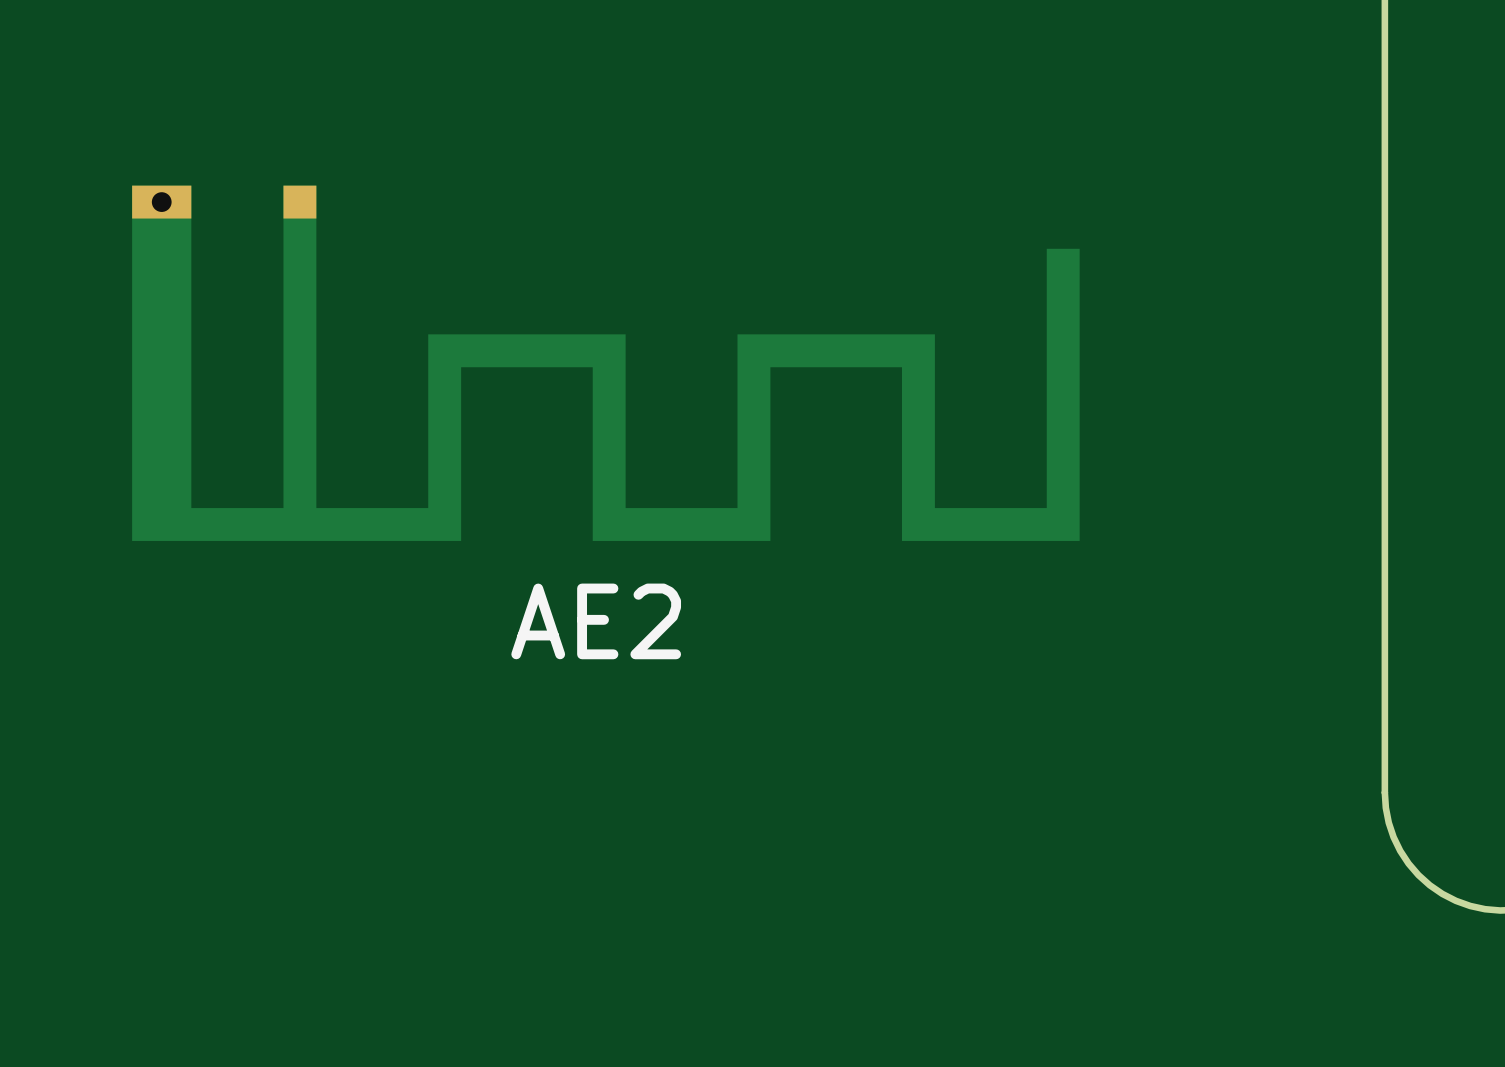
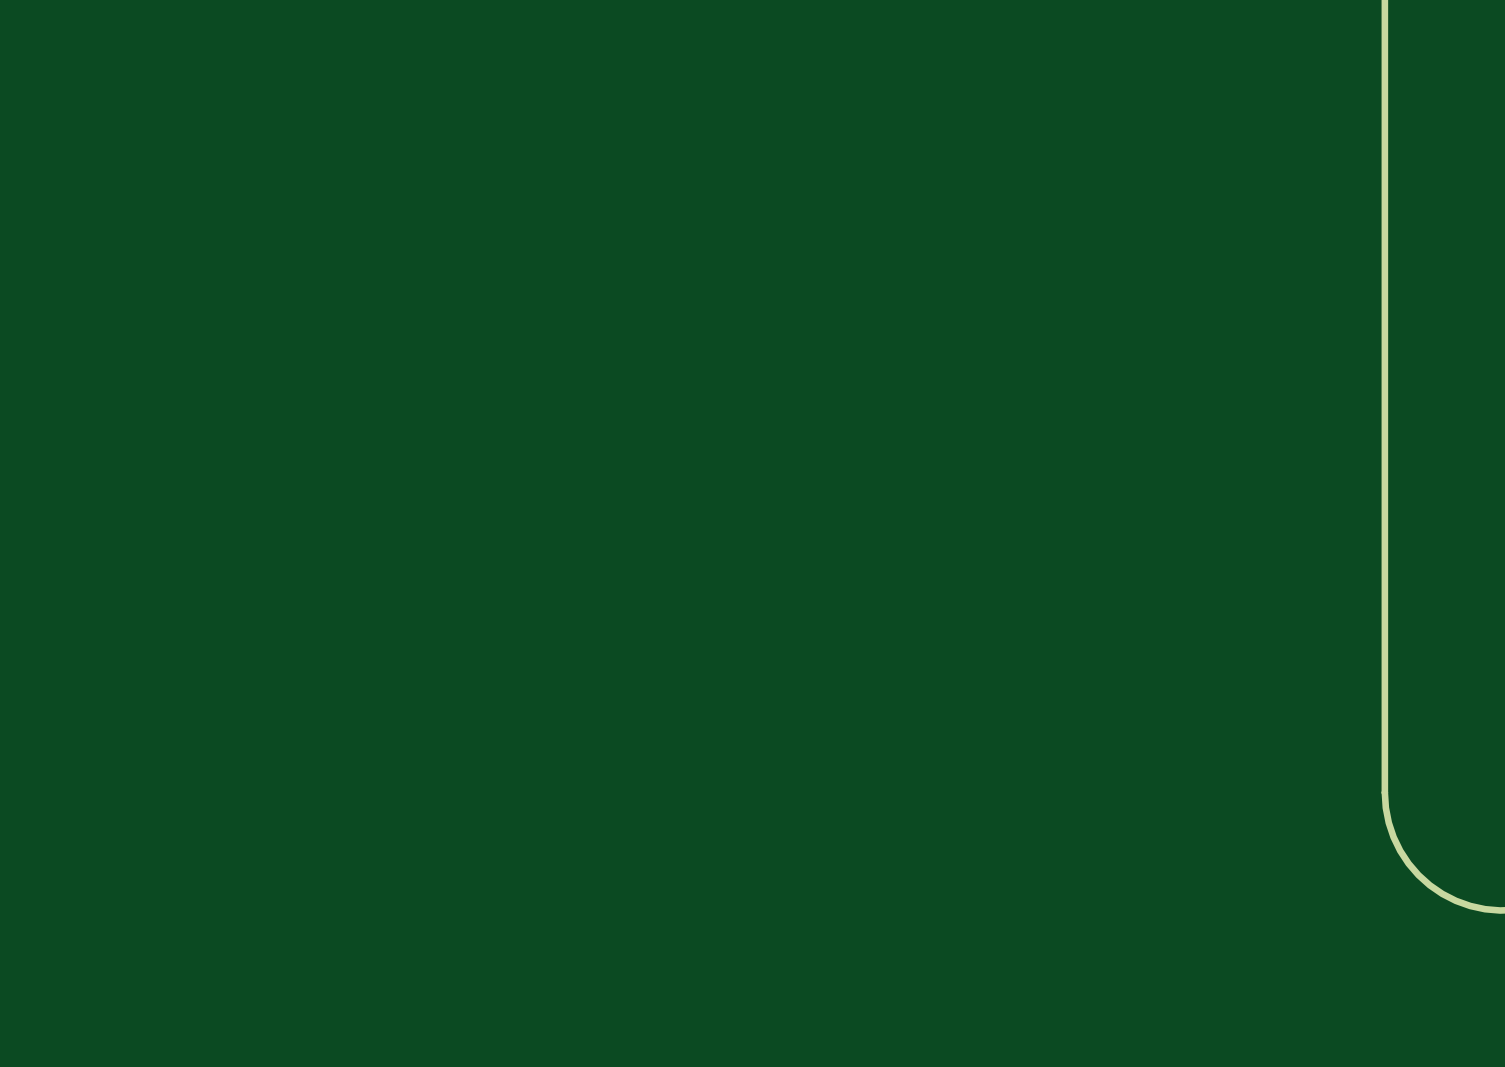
AE2: (605, 363) -> none

